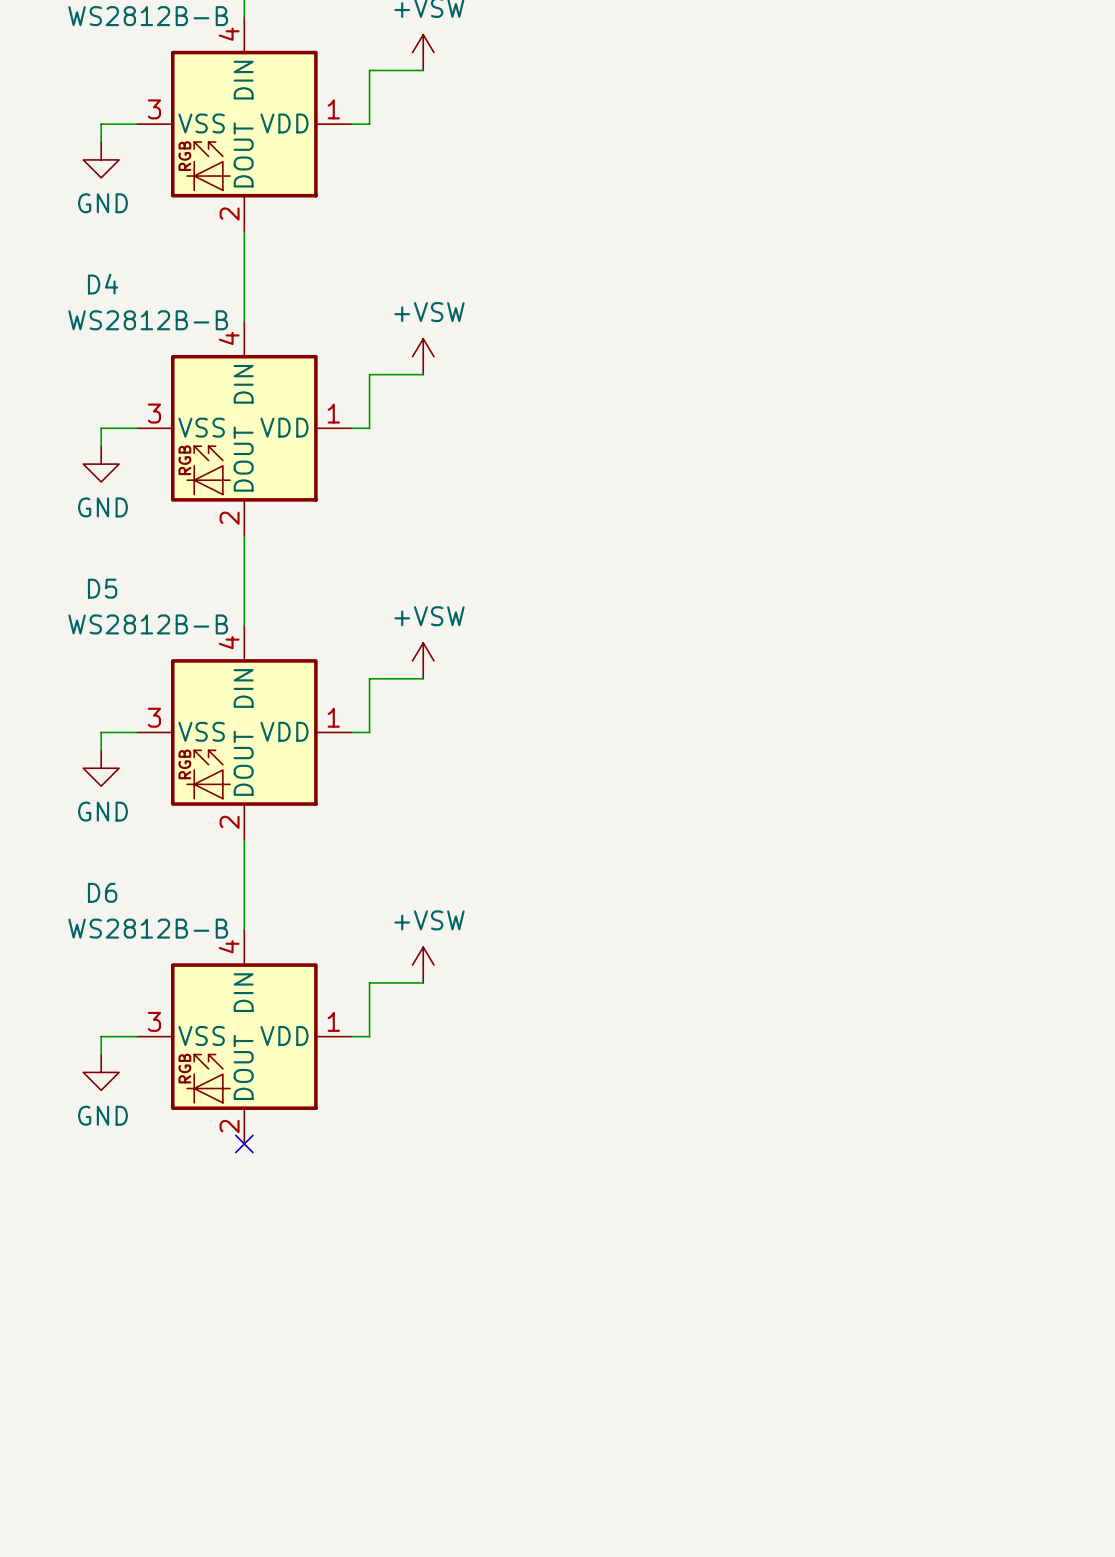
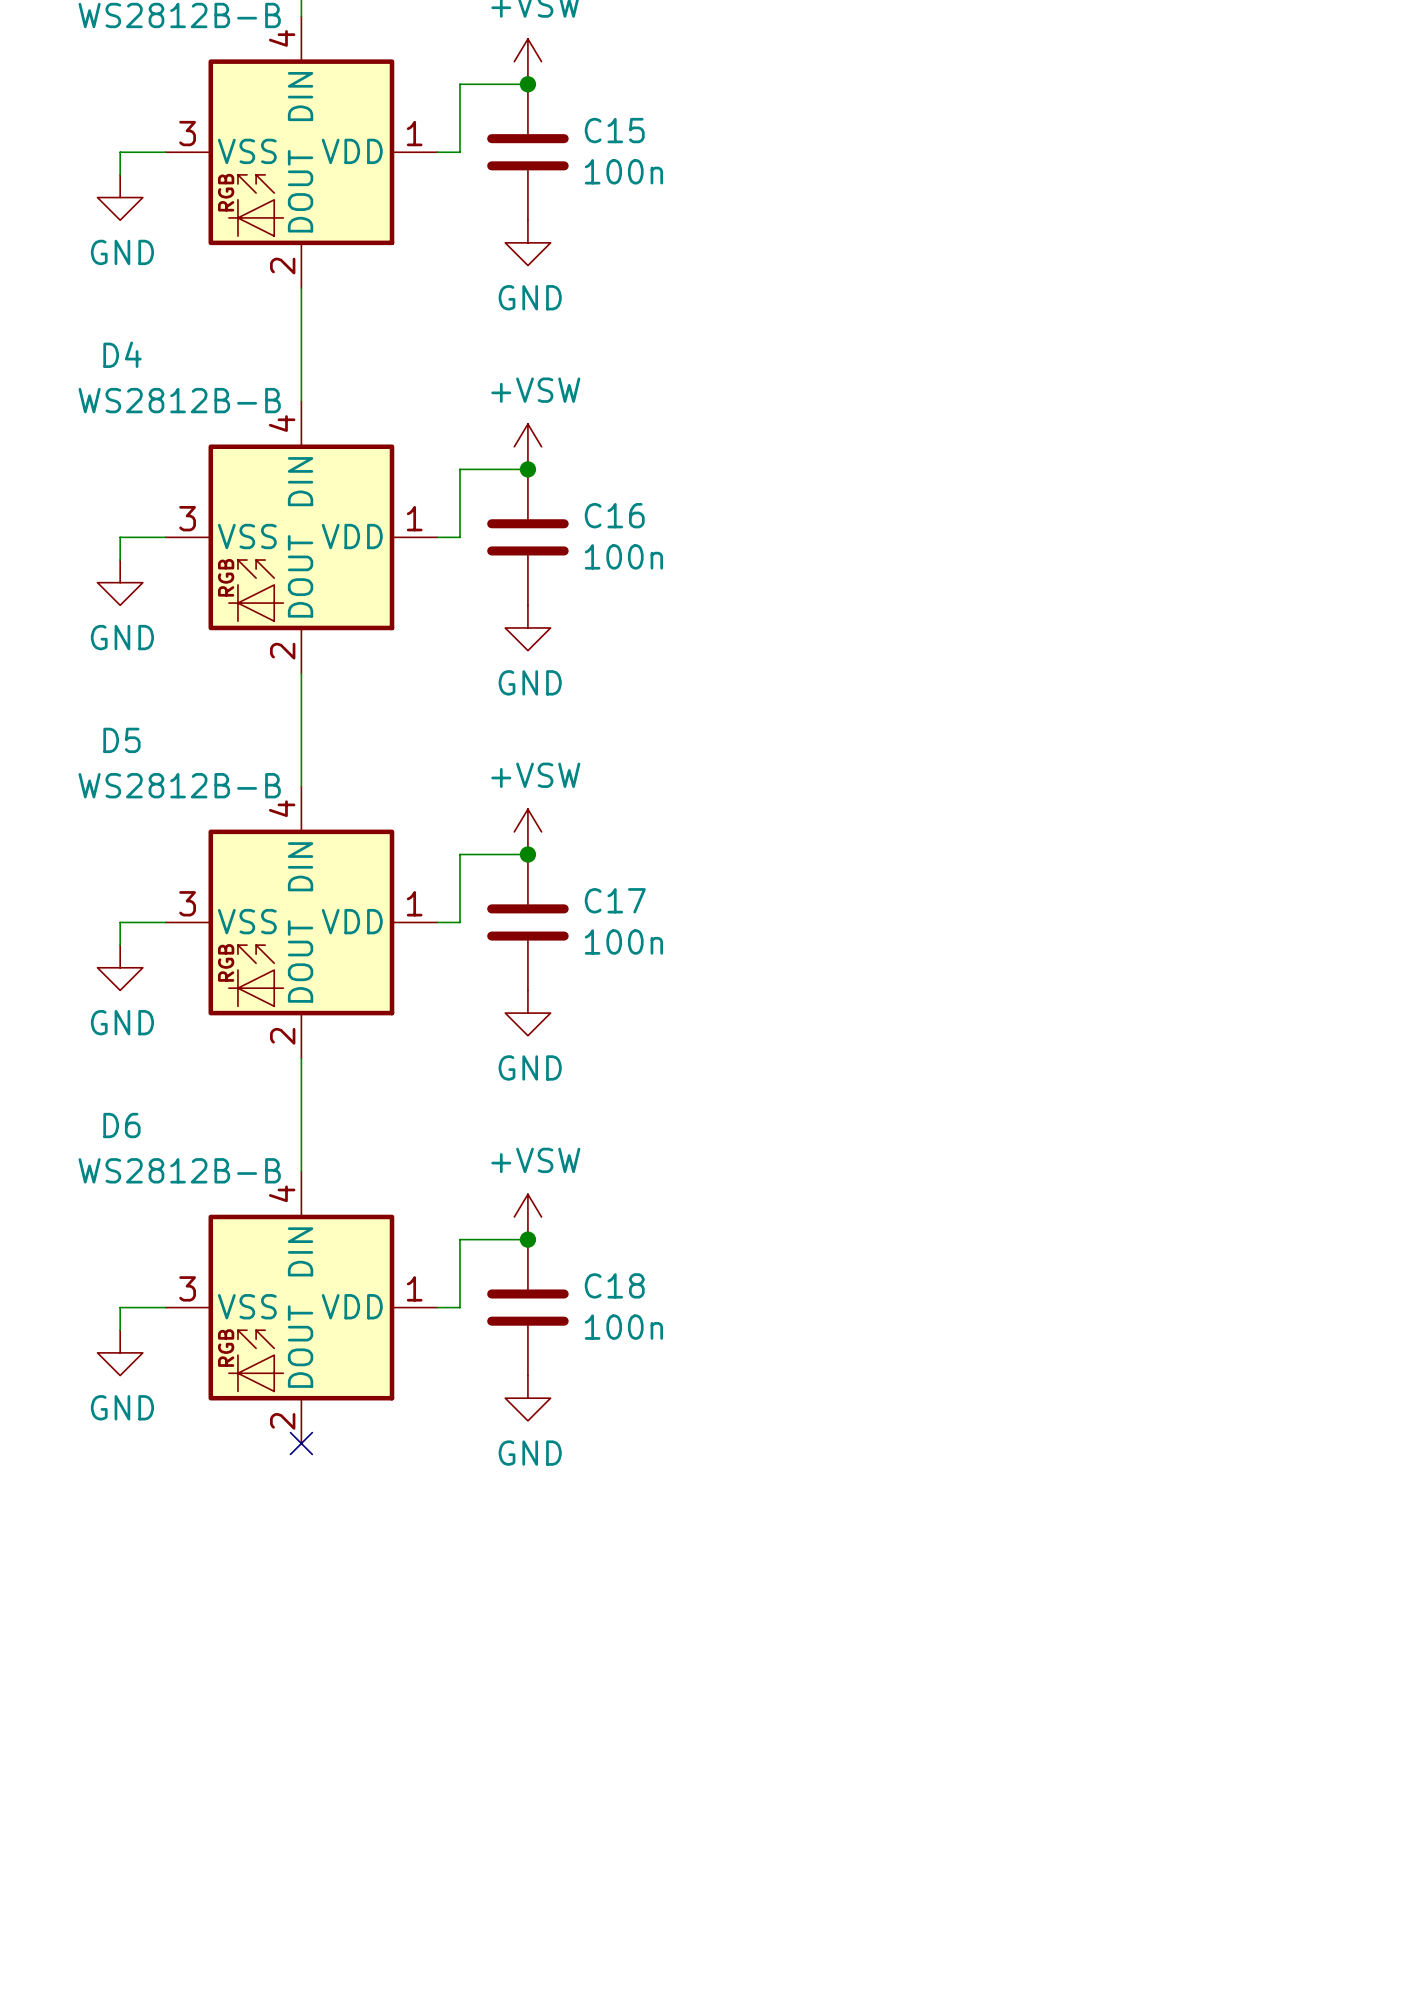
junction: none -> (527, 84)
C15: none -> 100n (527, 152)
power symbol: none -> GND (527, 242)
junction: none -> (527, 469)
C16: none -> 100n (527, 537)
power symbol: none -> GND (527, 627)
junction: none -> (527, 854)
C17: none -> 100n (527, 922)
power symbol: none -> GND (527, 1013)
junction: none -> (527, 1239)
C18: none -> 100n (527, 1307)
power symbol: none -> GND (527, 1398)

